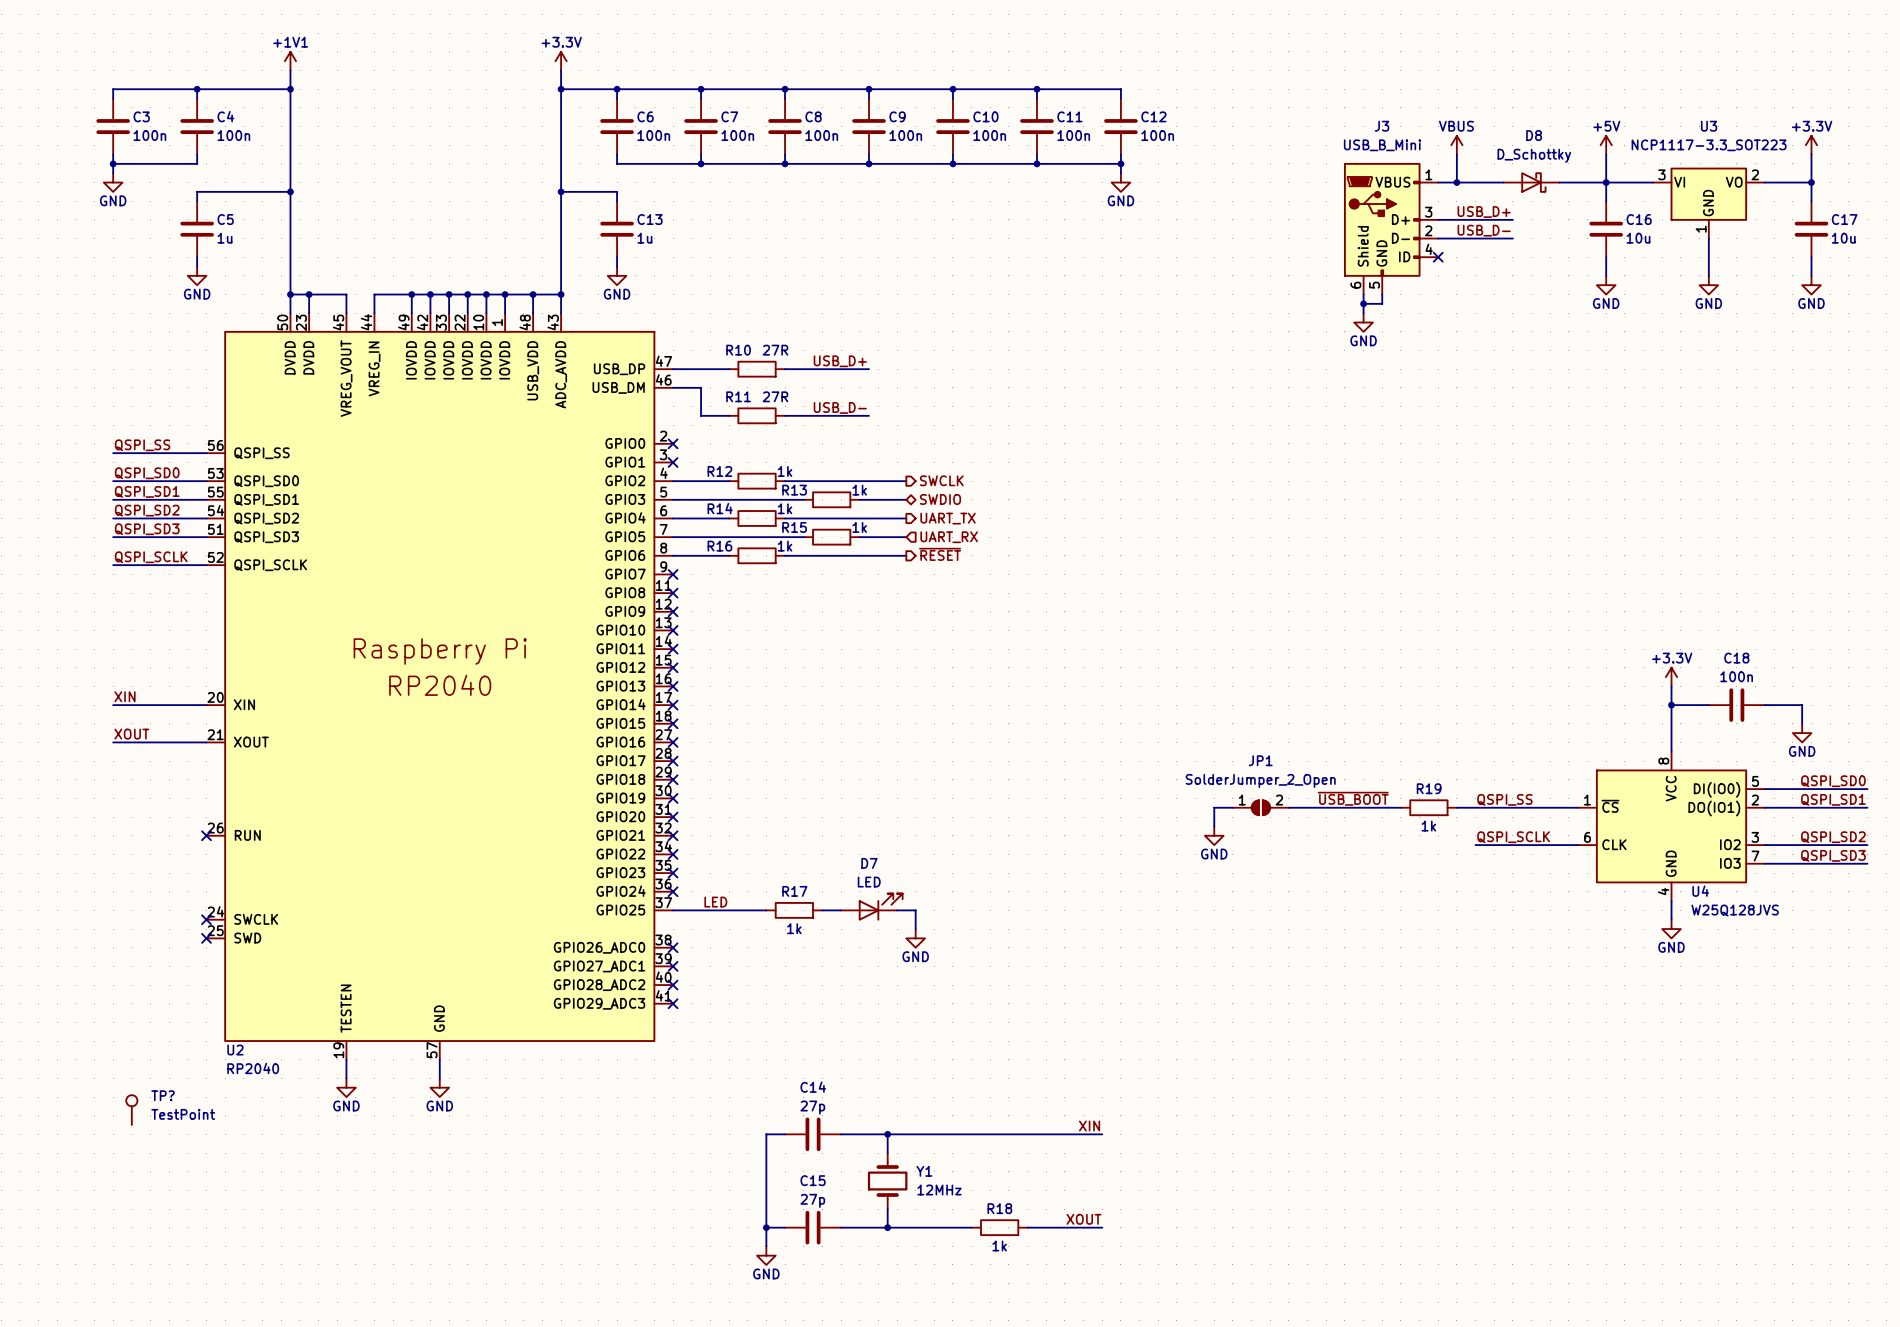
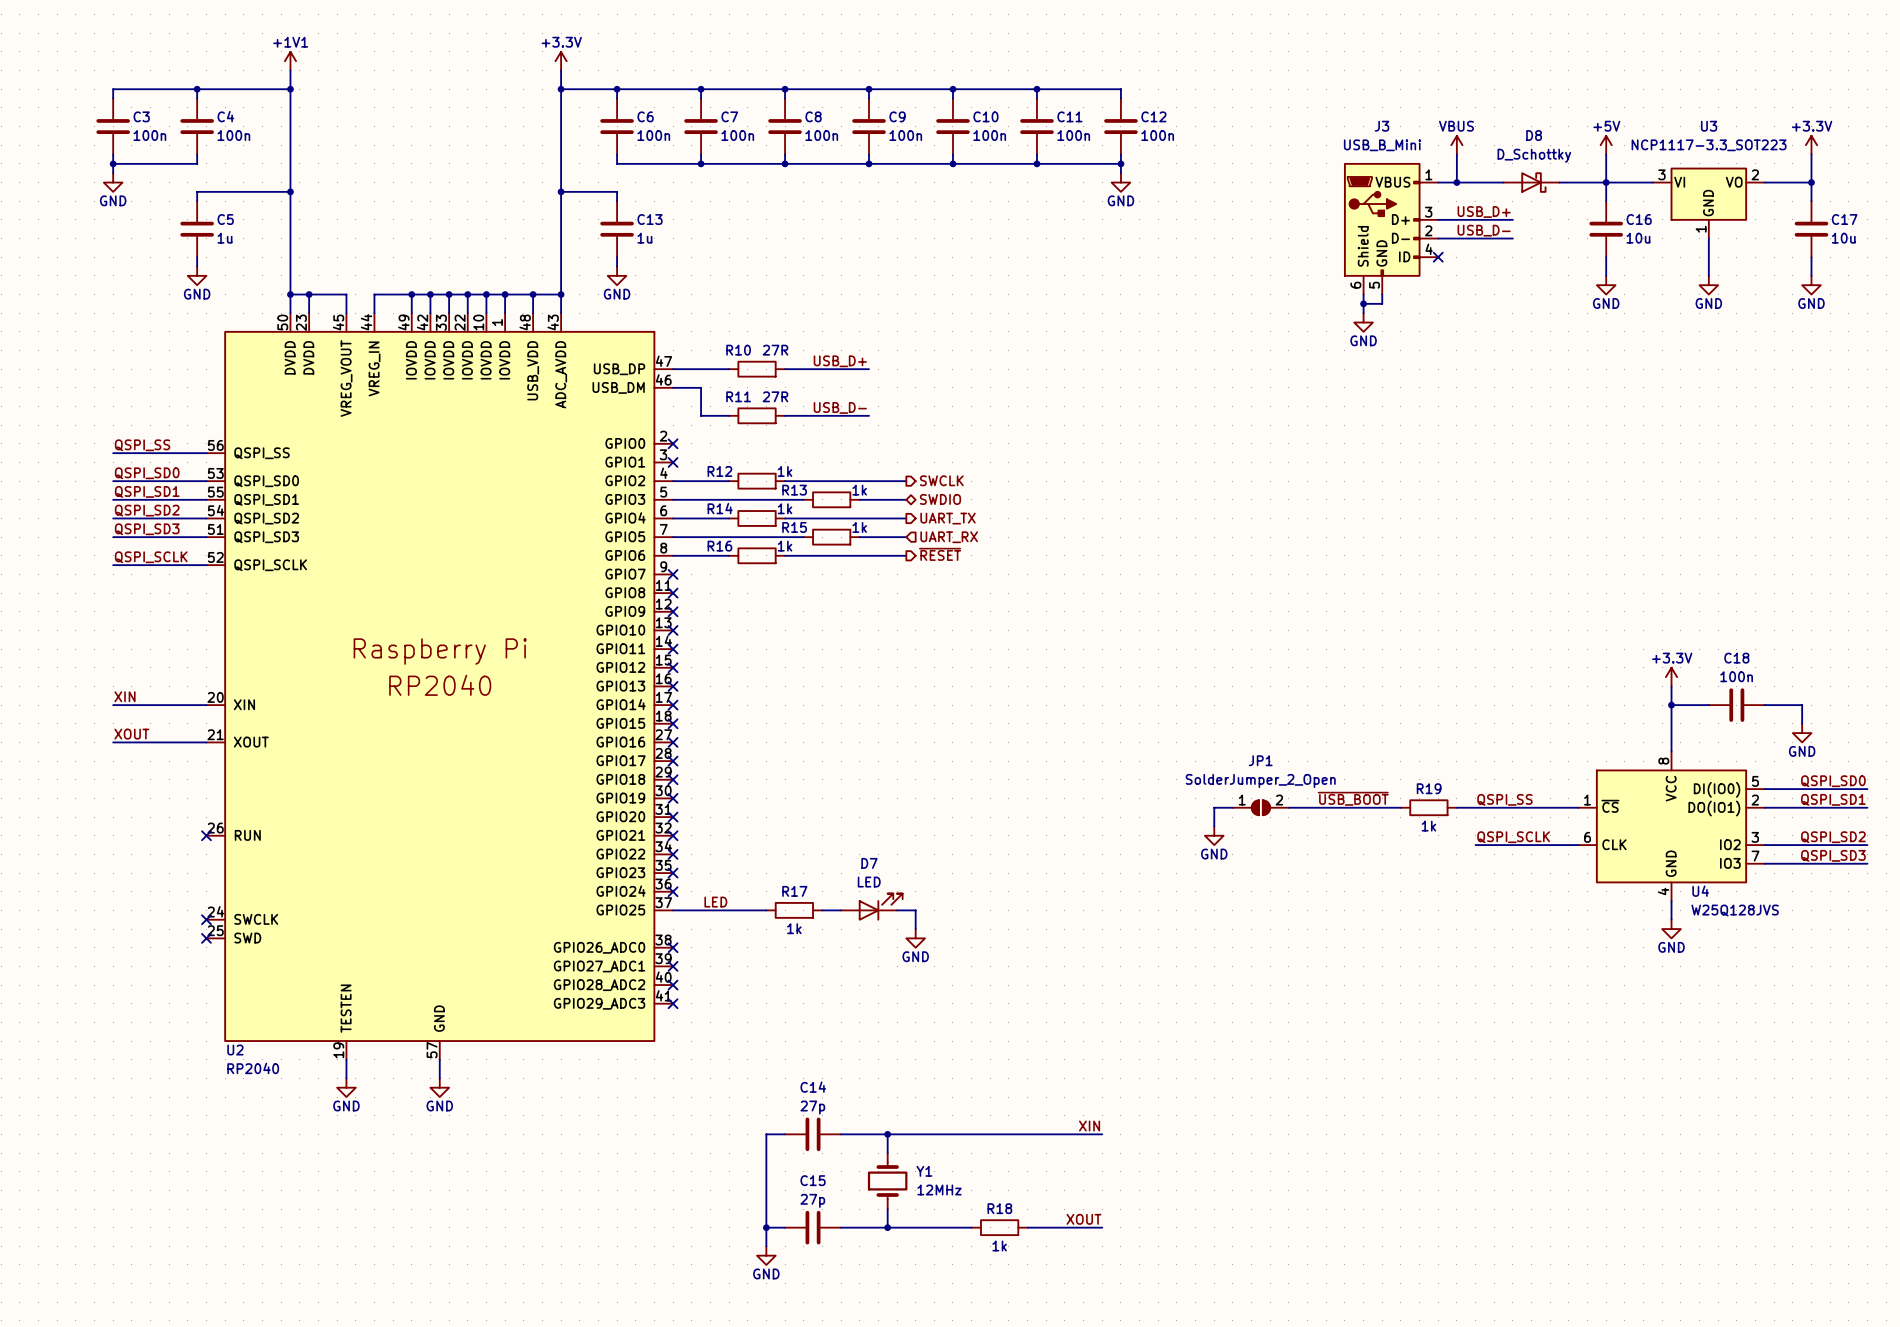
TP?: TestPoint (131, 1110) -> none

